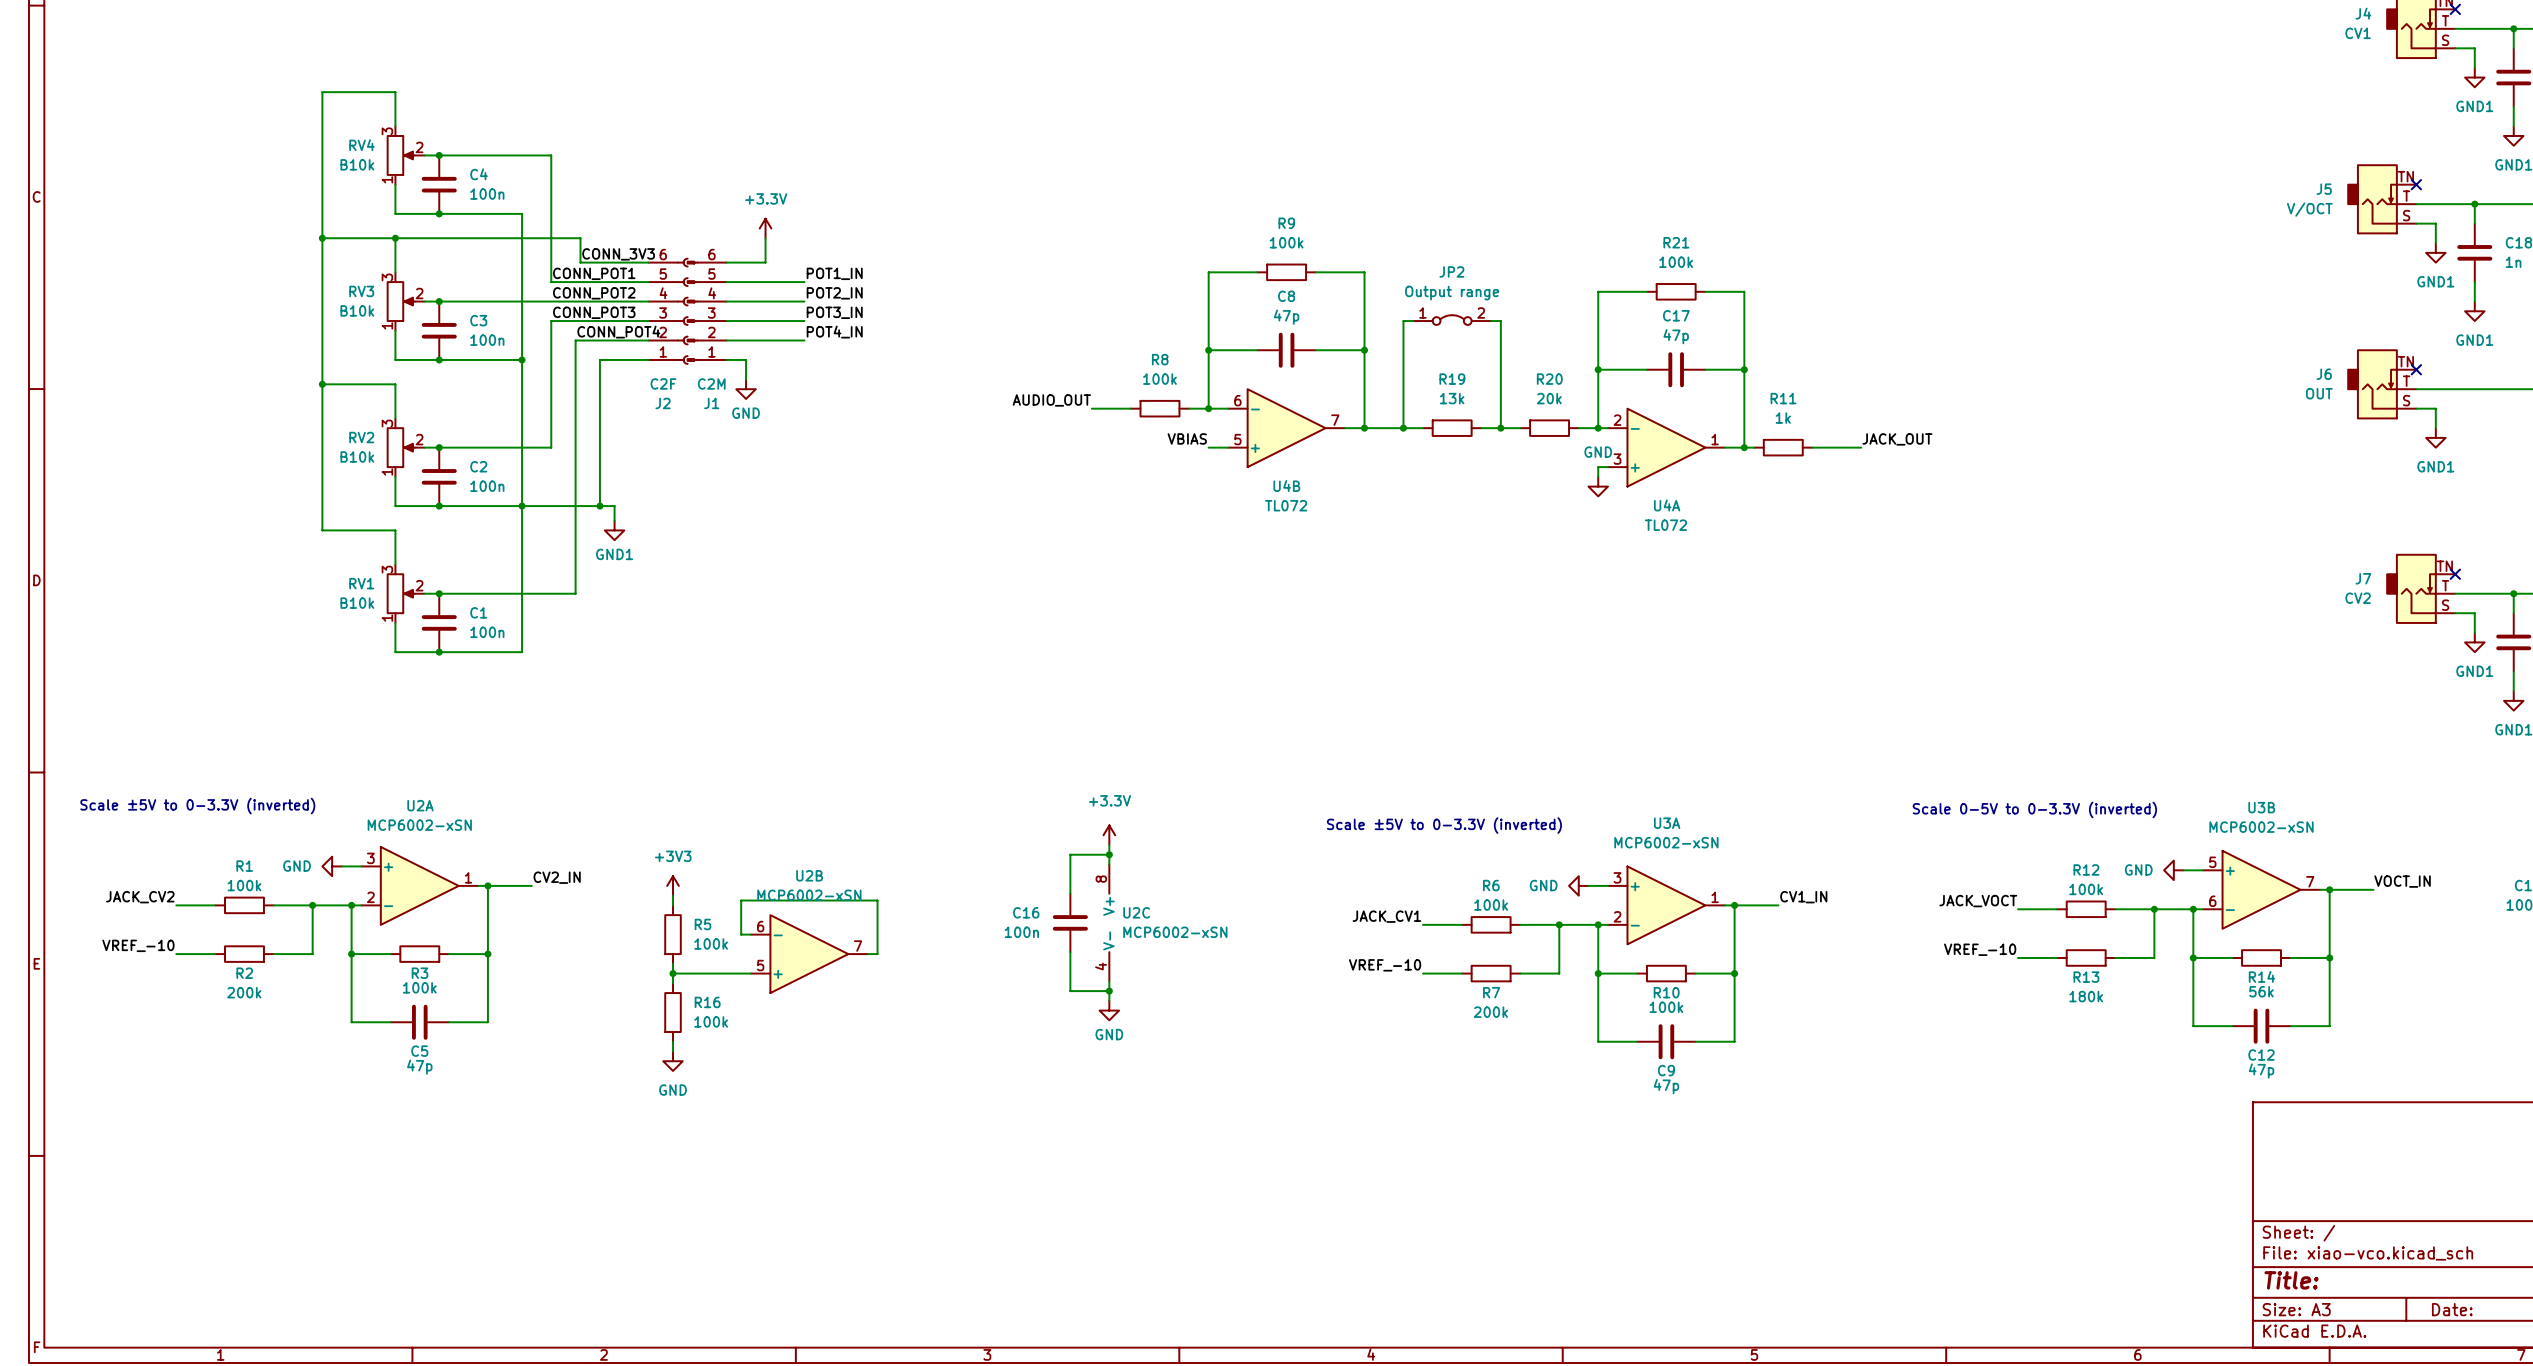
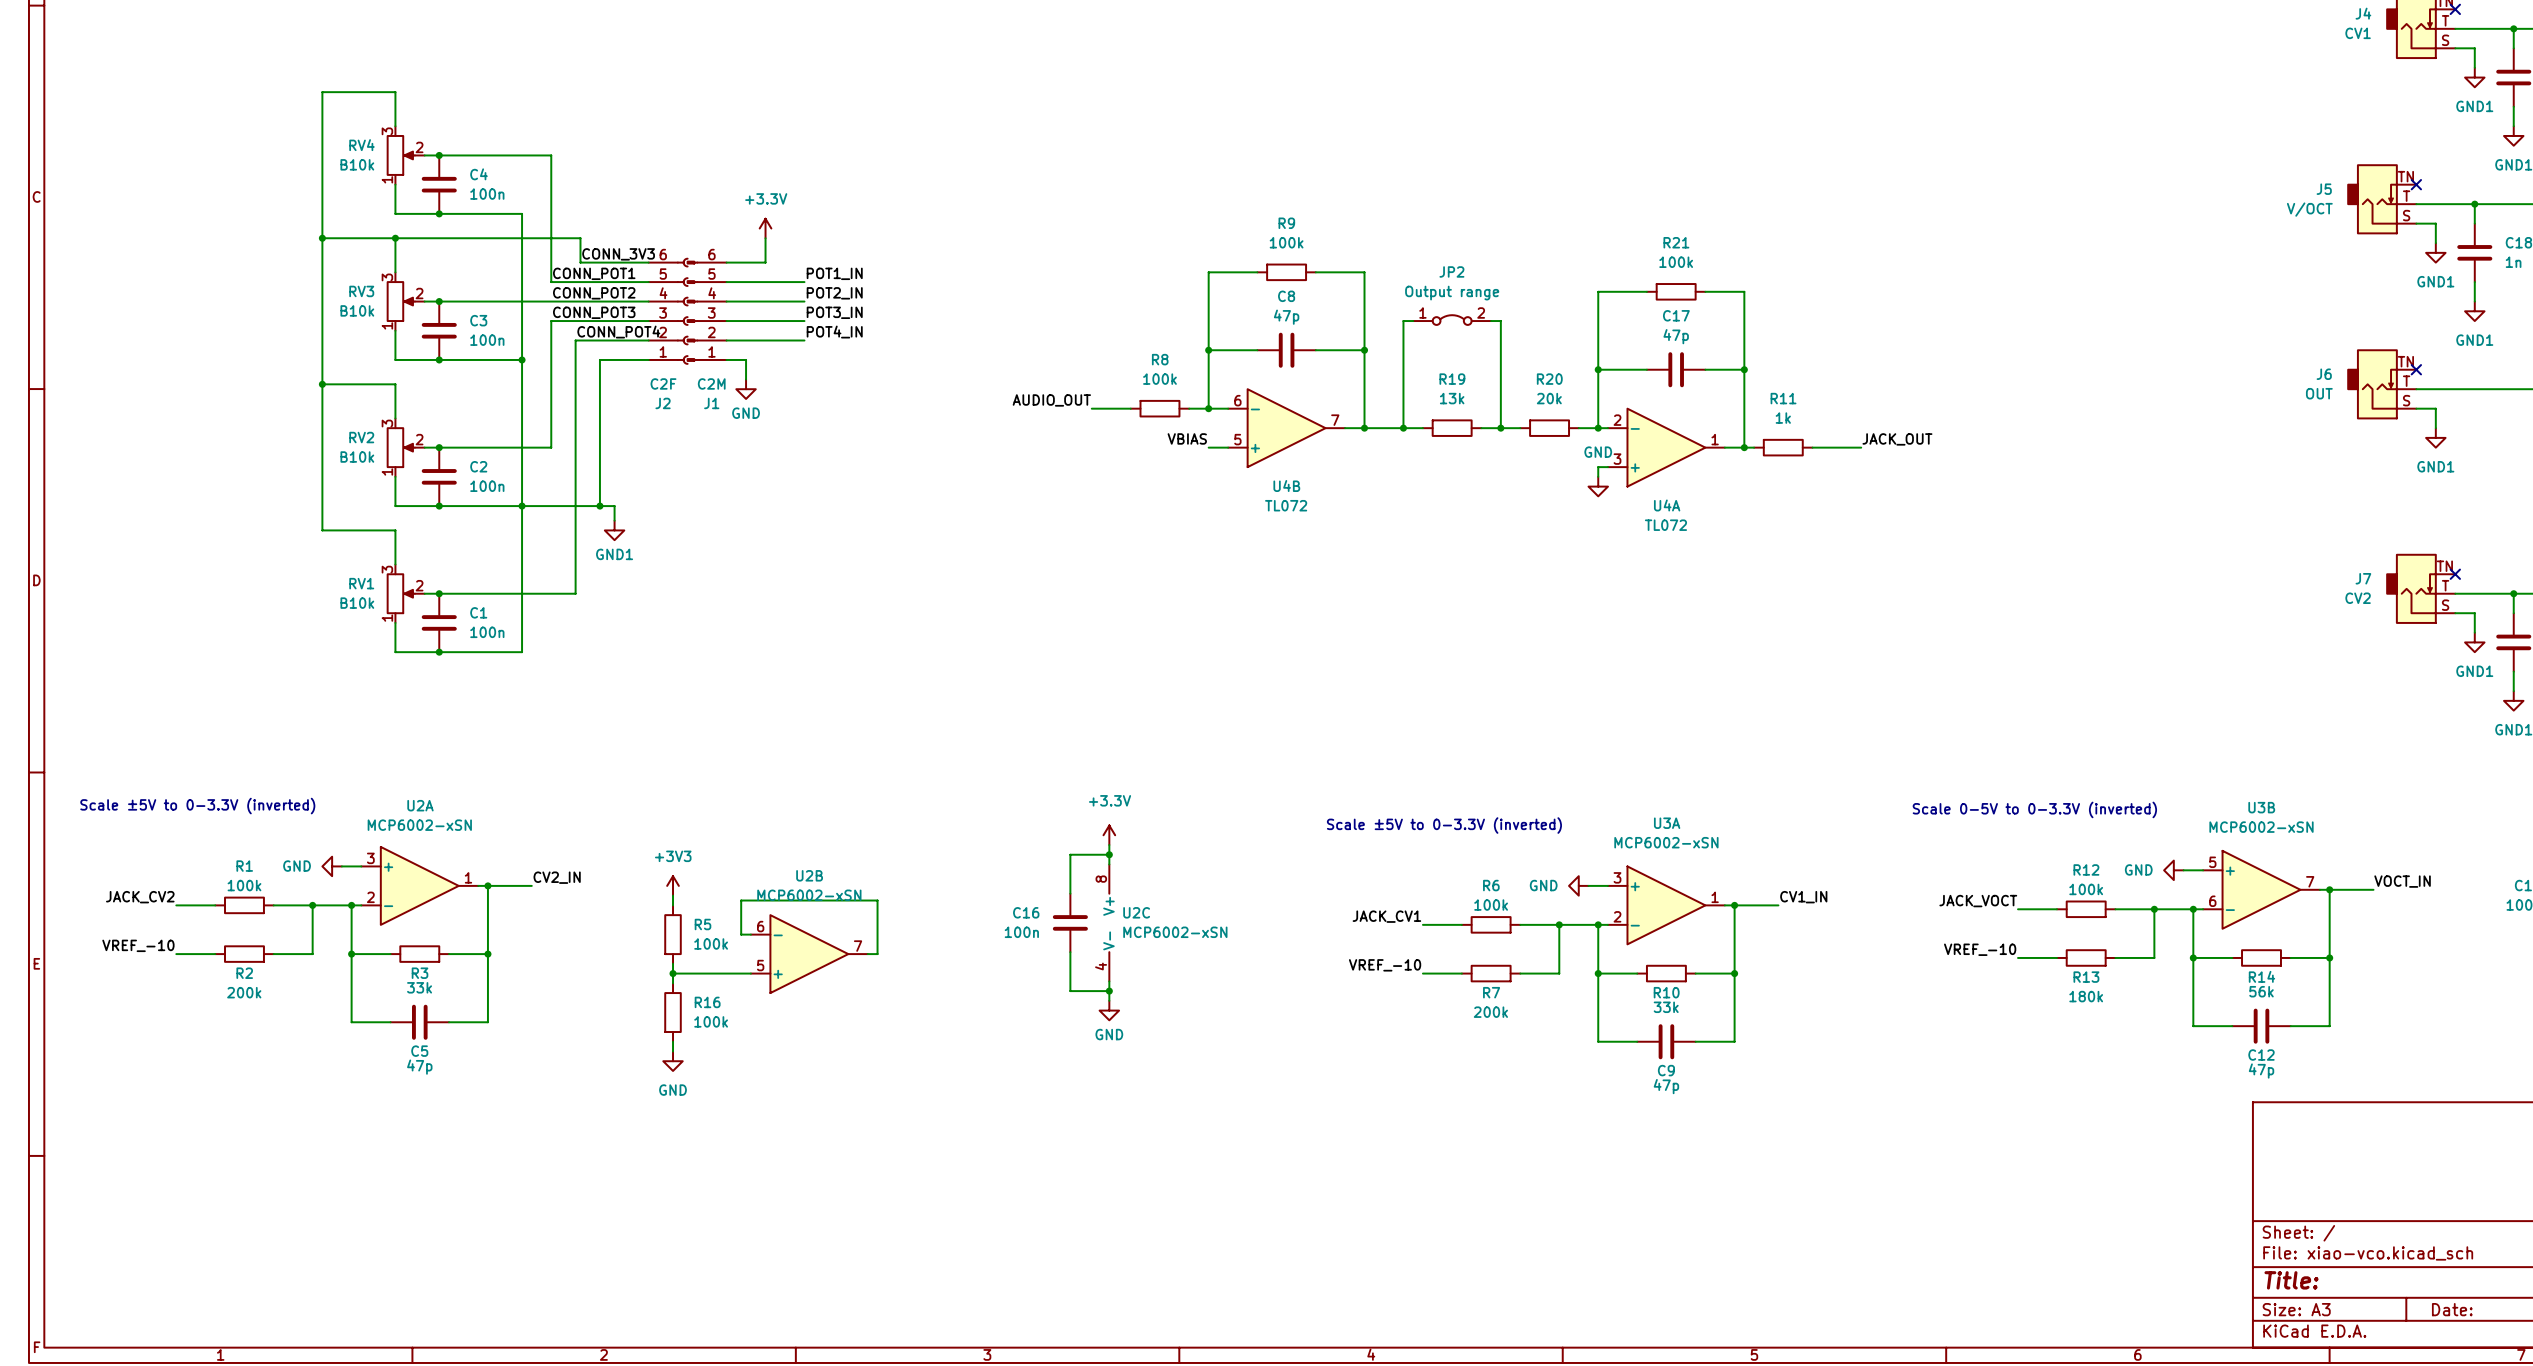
R3 value: 100k (419, 987) -> 33k (419, 987)
R10 value: 100k (1666, 1007) -> 33k (1666, 1007)

